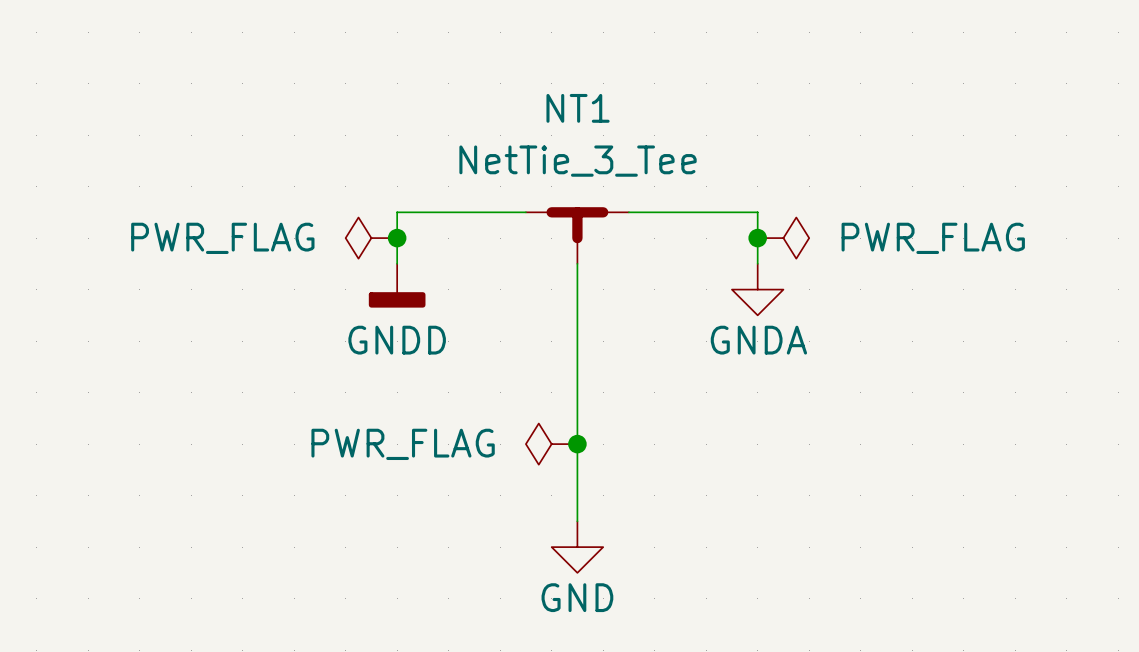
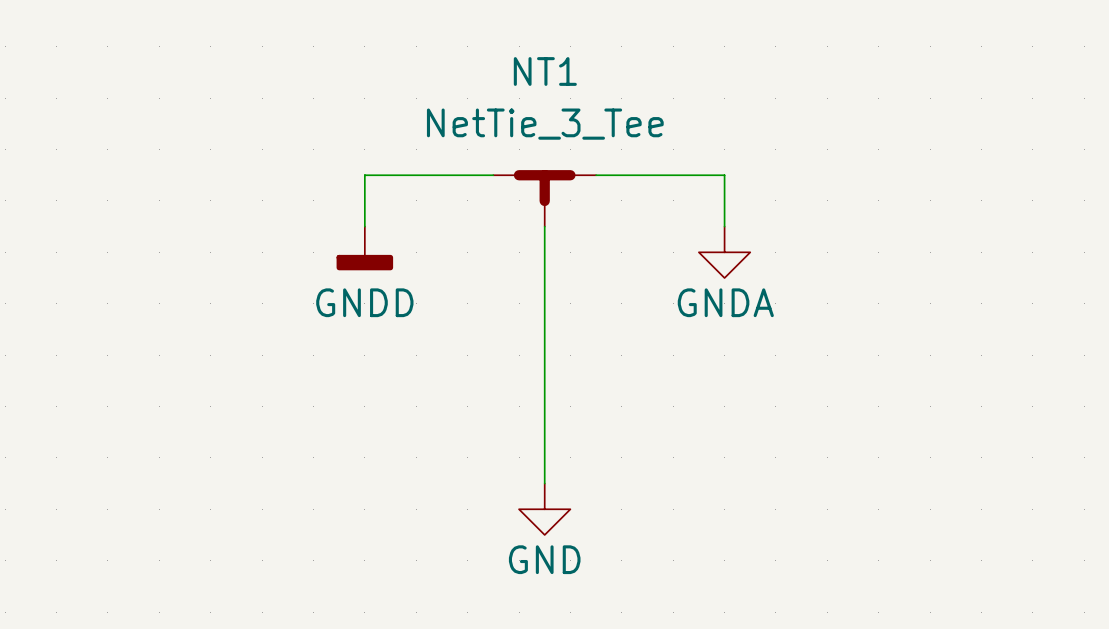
power symbol: PWR_FLAG (371, 238) -> none
junction: (397, 238) -> none
junction: (757, 238) -> none
power symbol: PWR_FLAG (783, 238) -> none
power symbol: PWR_FLAG (551, 444) -> none
junction: (577, 444) -> none

